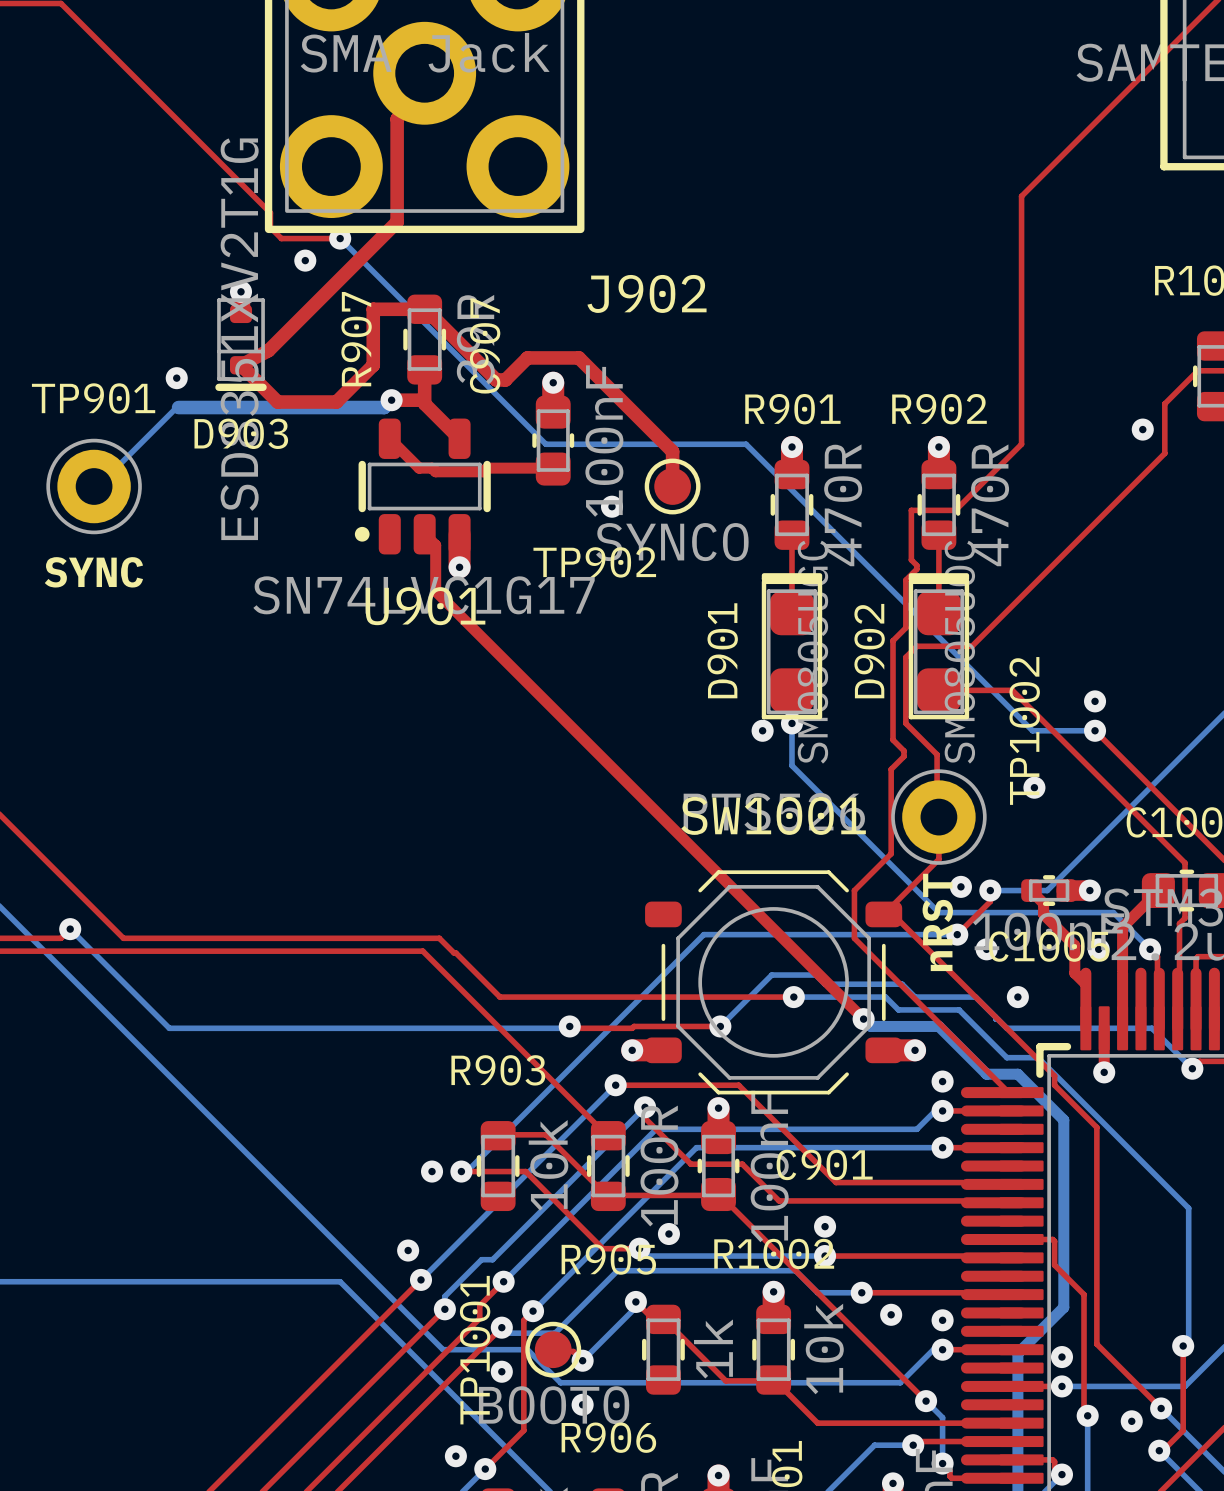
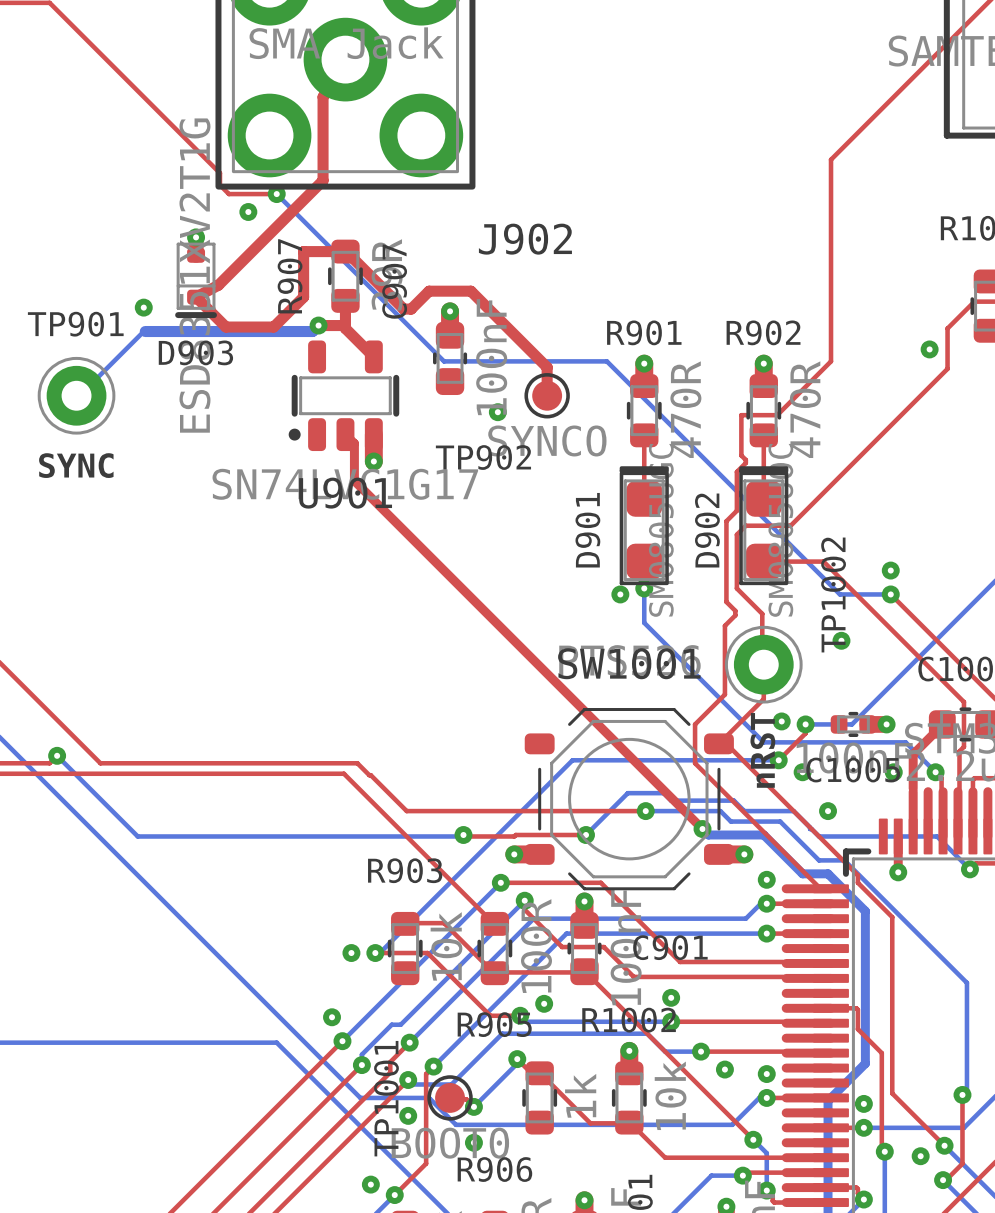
top track: (391, 440) (419, 468) (432, 468) (435, 471) (483, 471) (487, 468) (551, 468) -> none
top track: (1032, 892) (1043, 903) (1043, 914) (1074, 945) (1074, 973) (1084, 982) -> none
top track: (1085, 973) (1085, 1028) -> none

